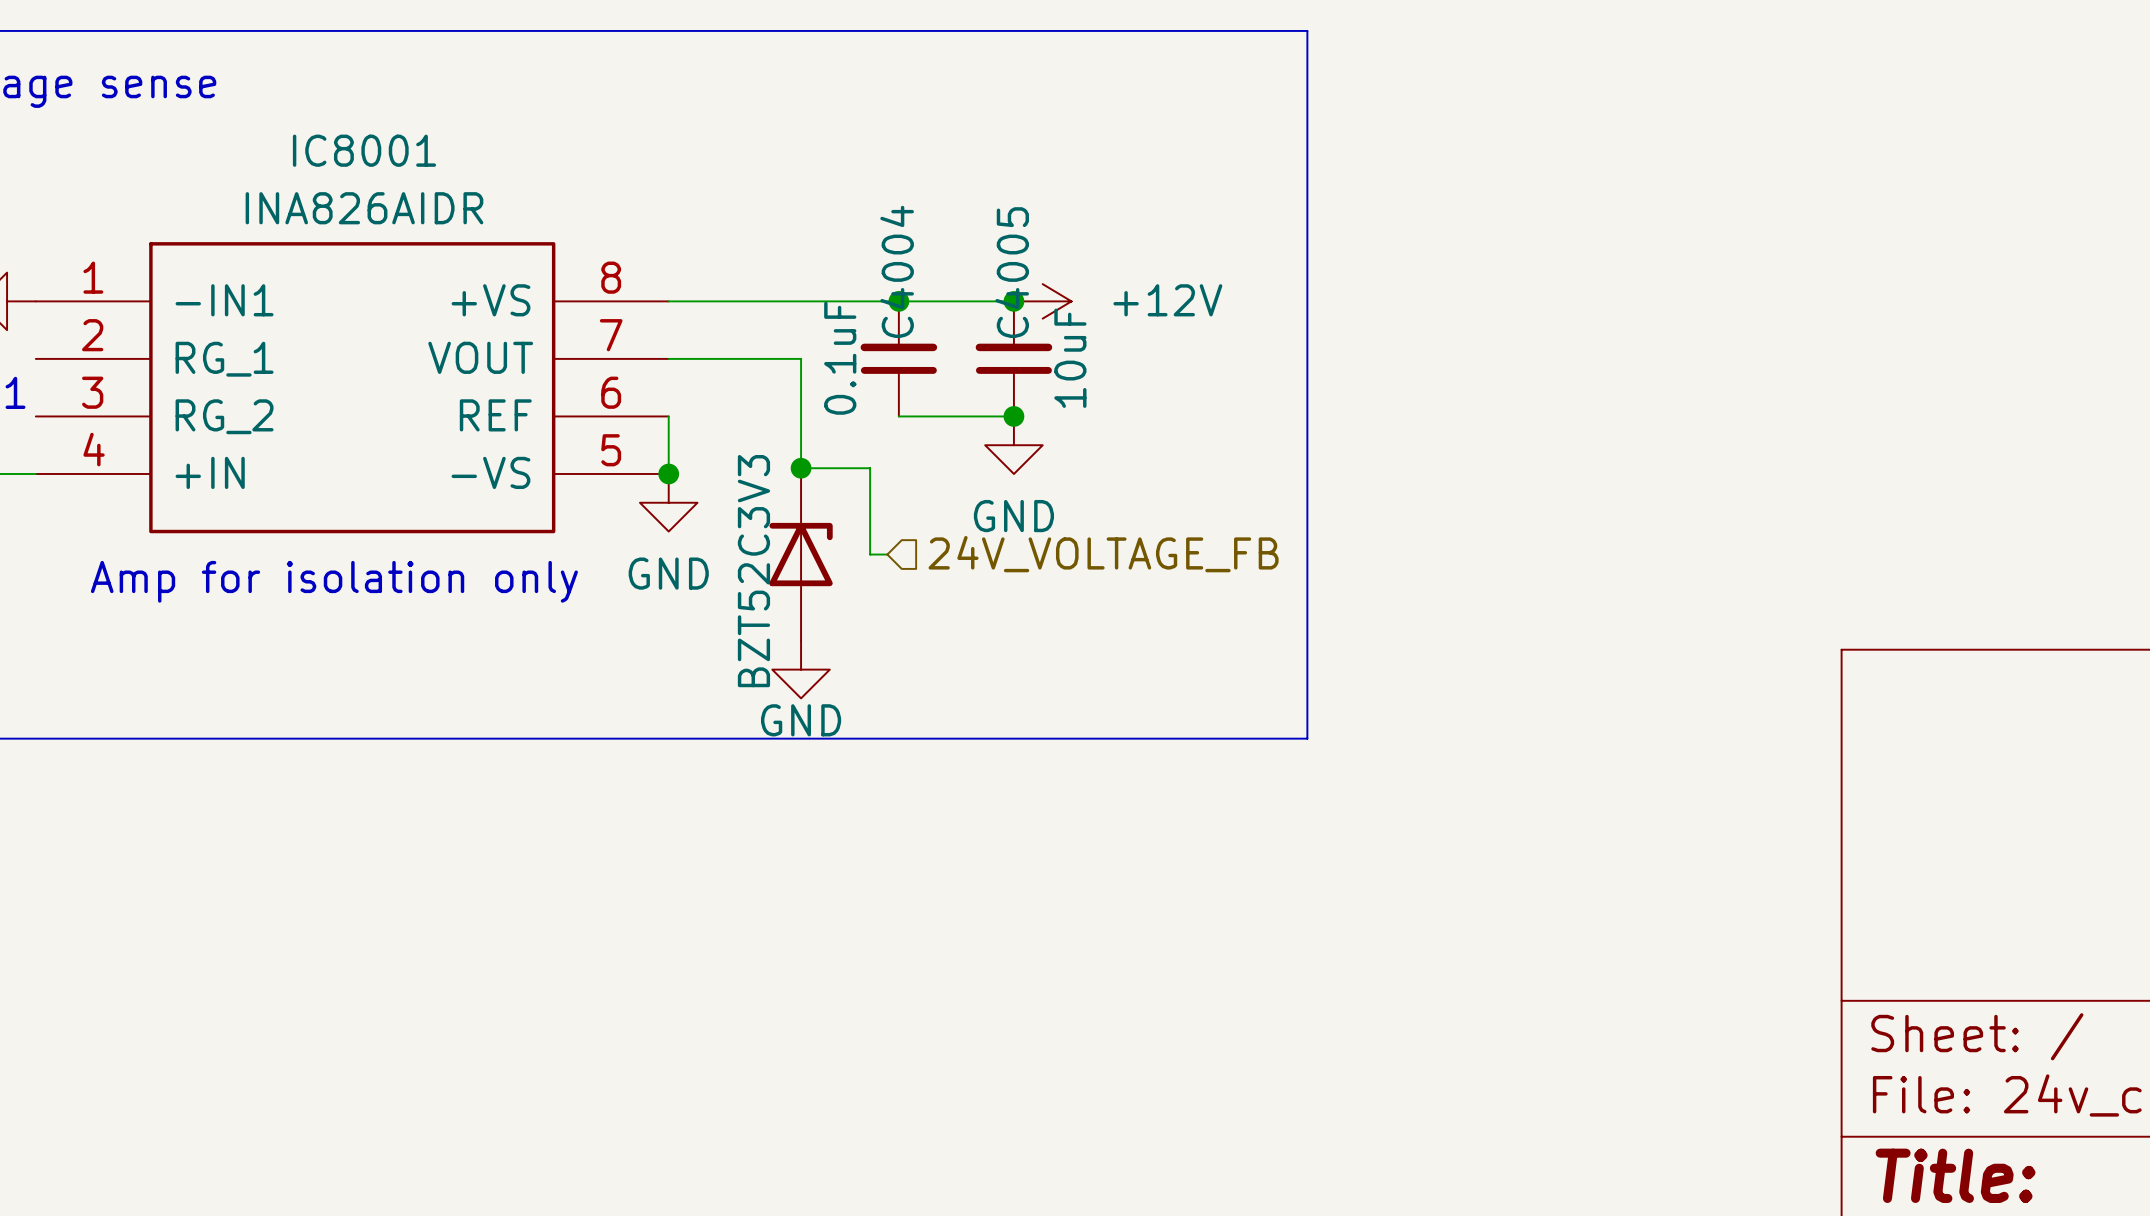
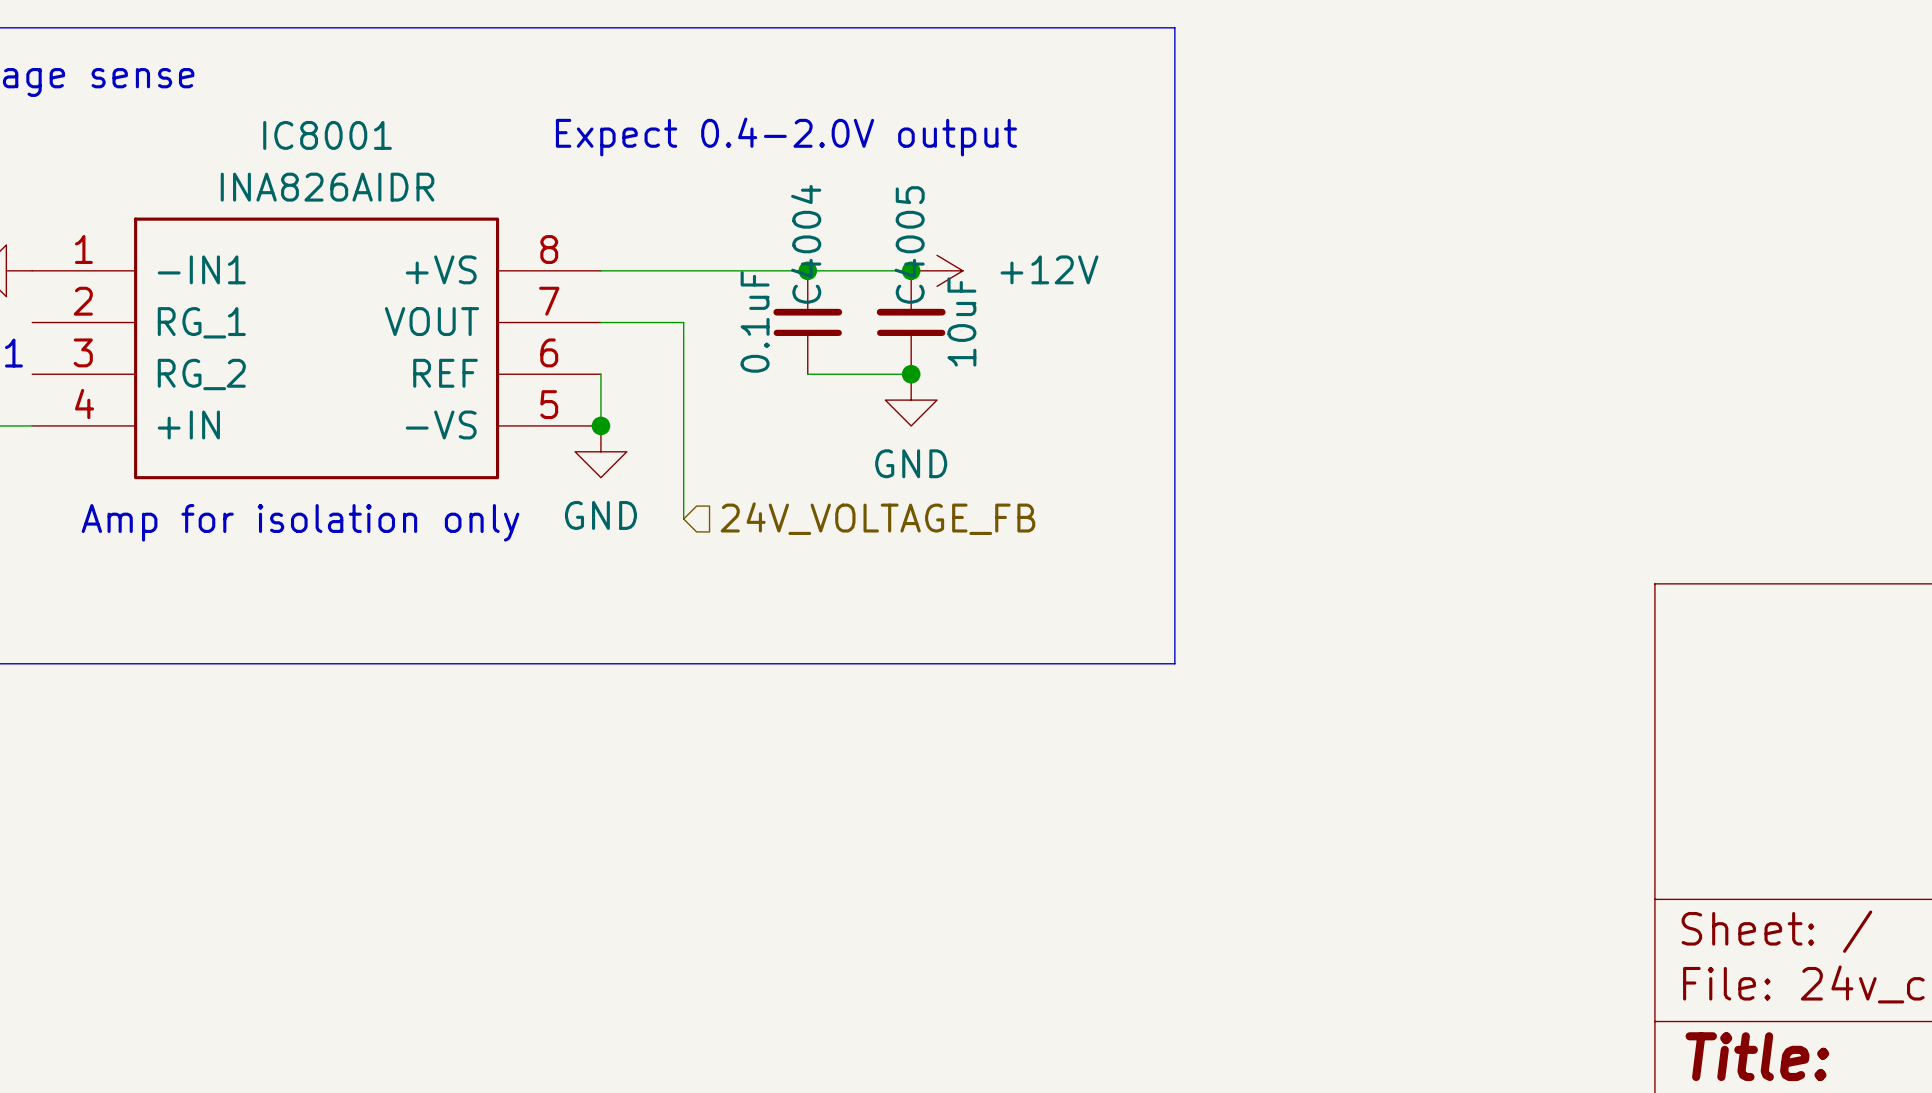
text: none -> Expect 0.4-2.0V output (786, 137)
wire: (760, 358) (801, 358) (801, 468) (870, 468) (870, 554) (887, 554) -> (683, 322) (683, 519)
junction: (801, 468) -> none
part: BZT52C3V3 (801, 554) -> none
hierarchical label position: 24V_VOLTAGE_FB (1103, 554) -> 24V_VOLTAGE_FB (877, 518)
power symbol: GND (801, 669) -> none

